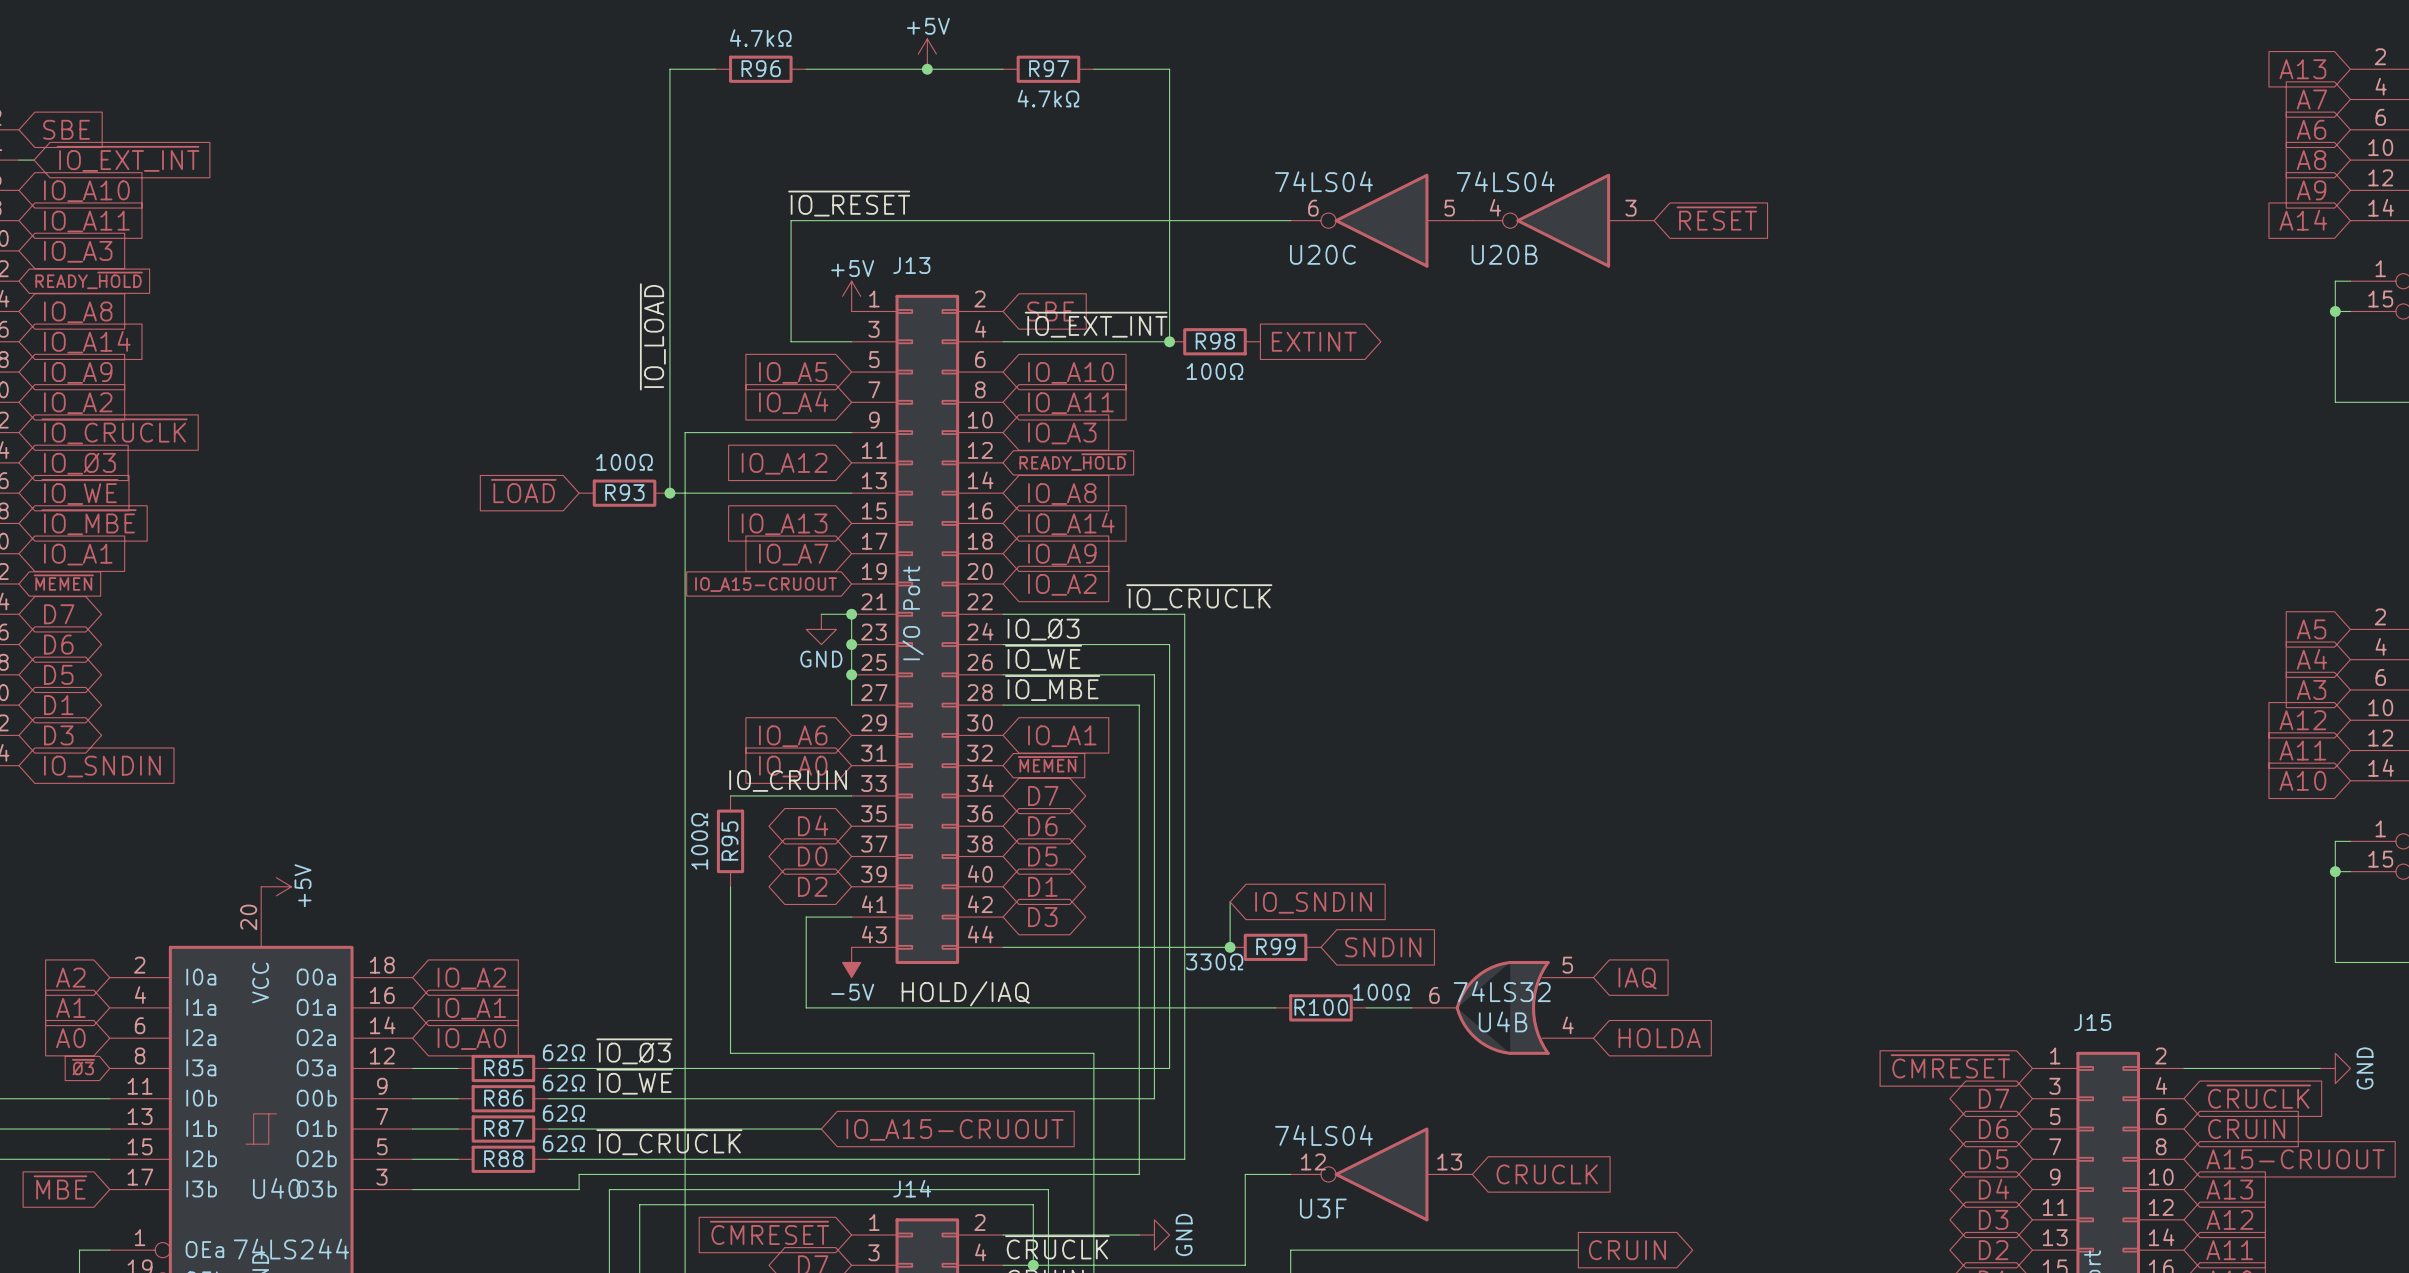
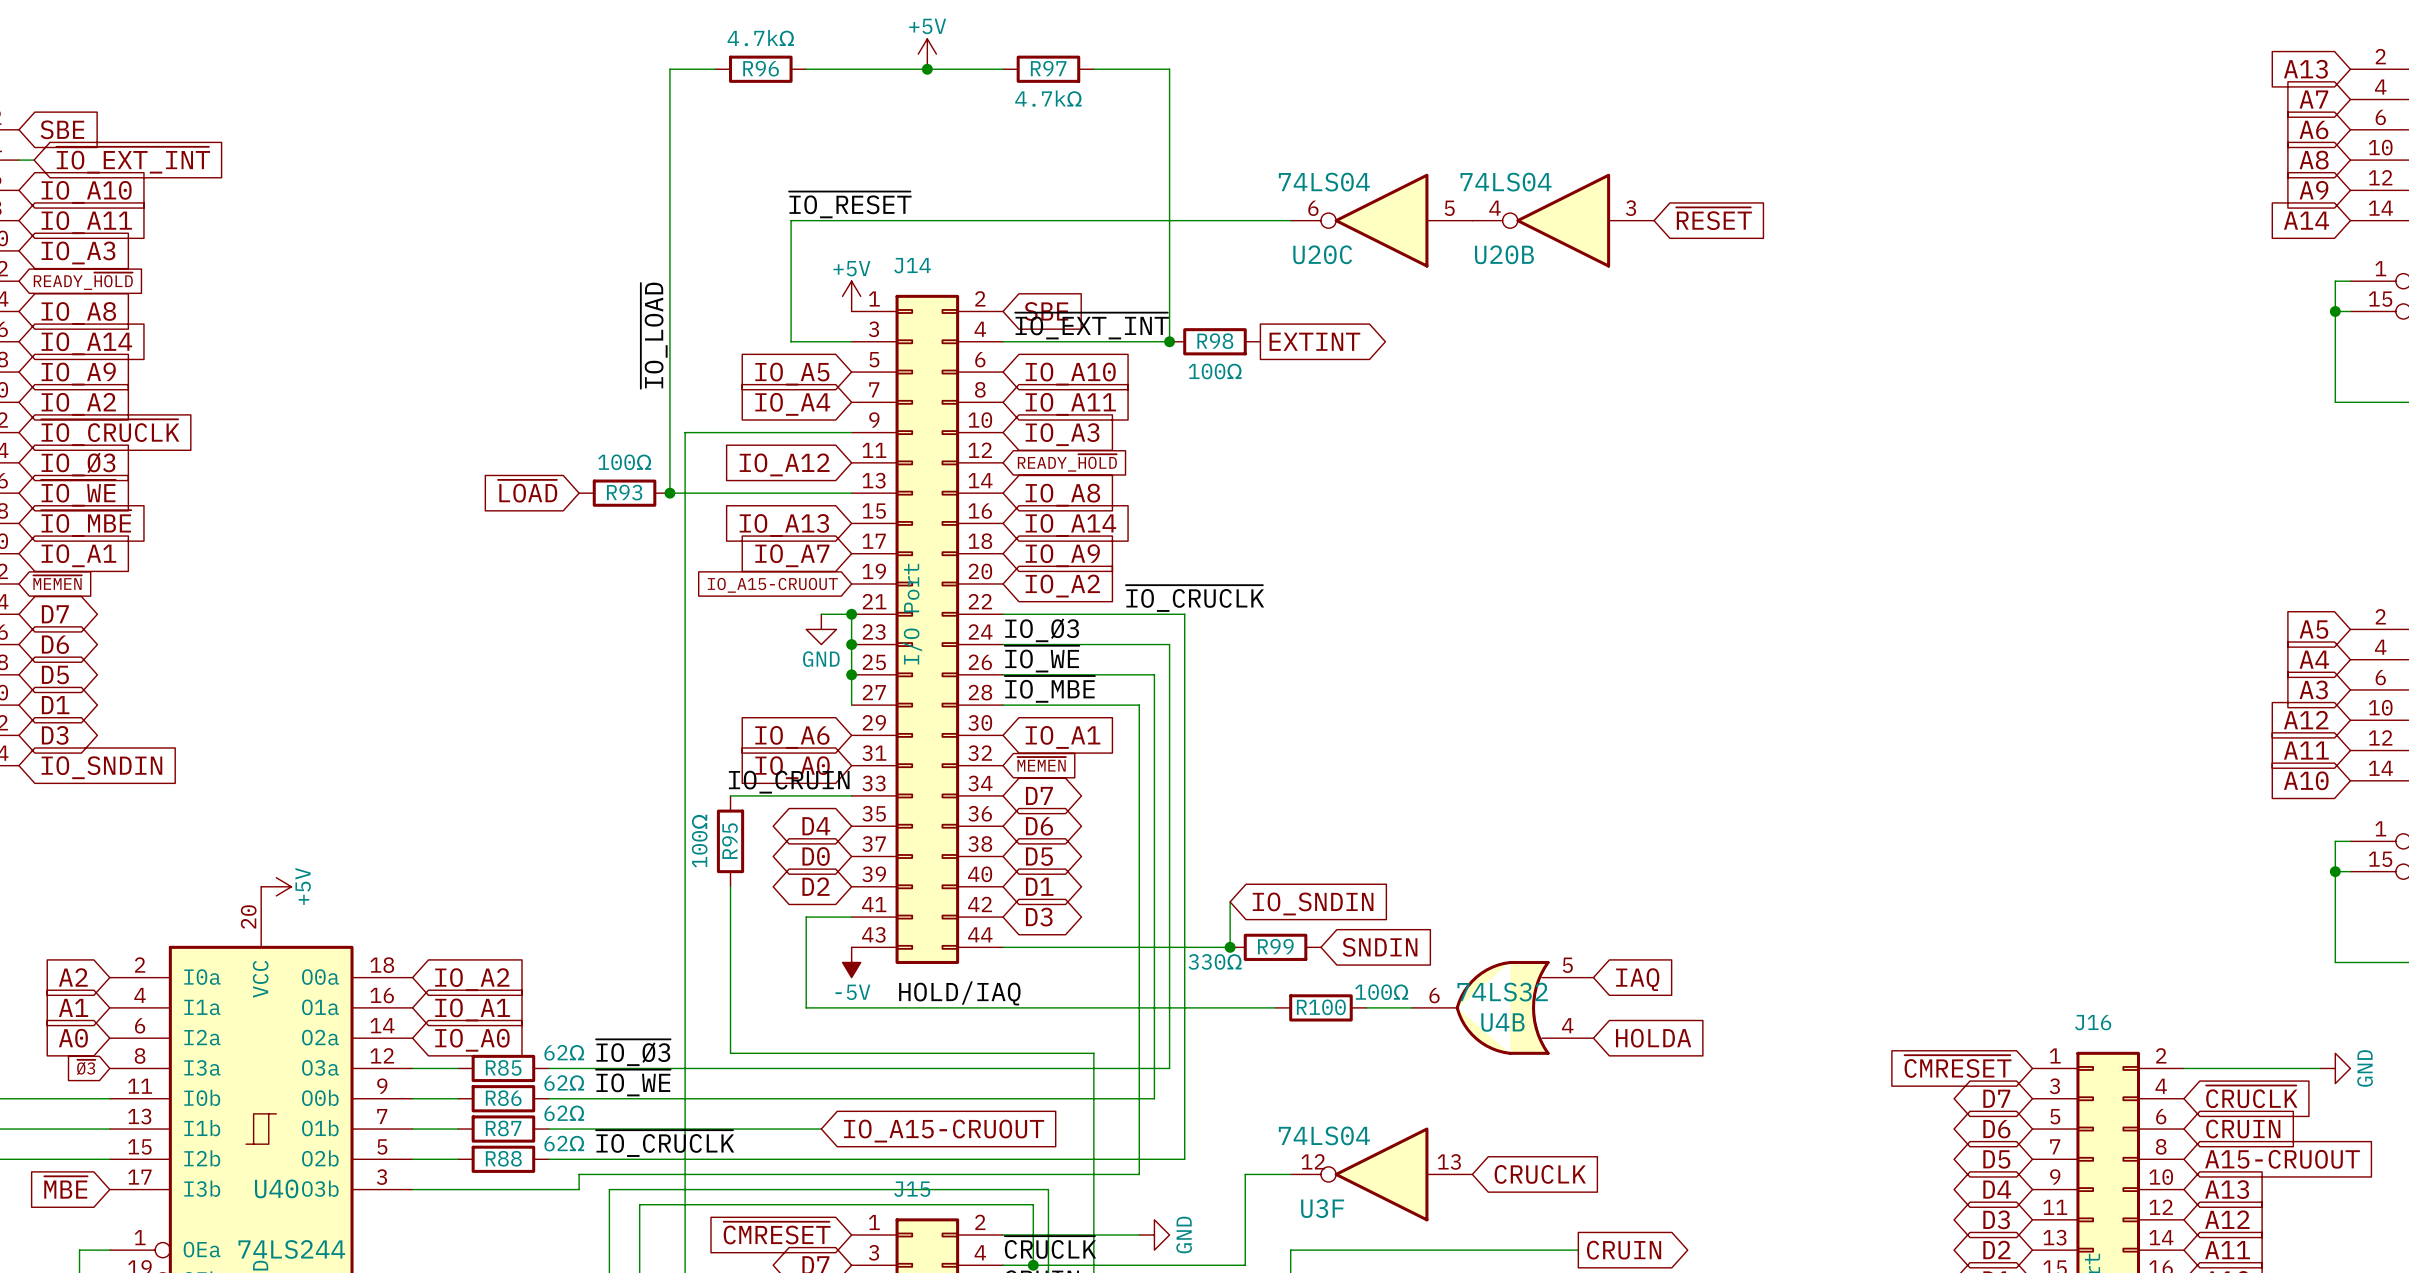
J13 name: J13 (911, 265) -> J14 (912, 265)
J15 name: J15 (2092, 1022) -> J16 (2093, 1022)
J14 name: J14 (912, 1188) -> J15 (912, 1189)

